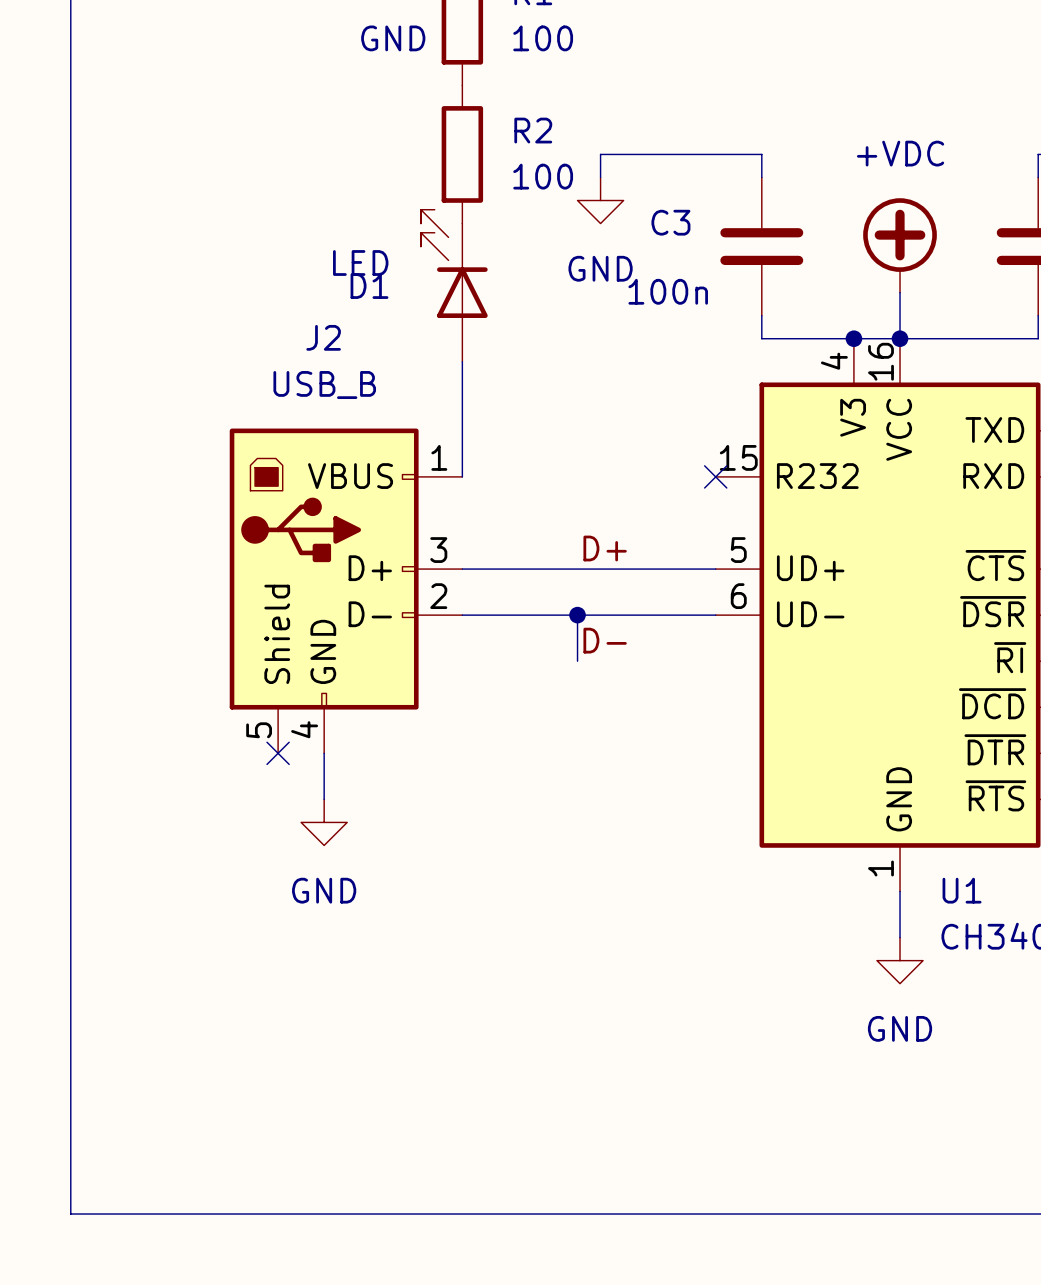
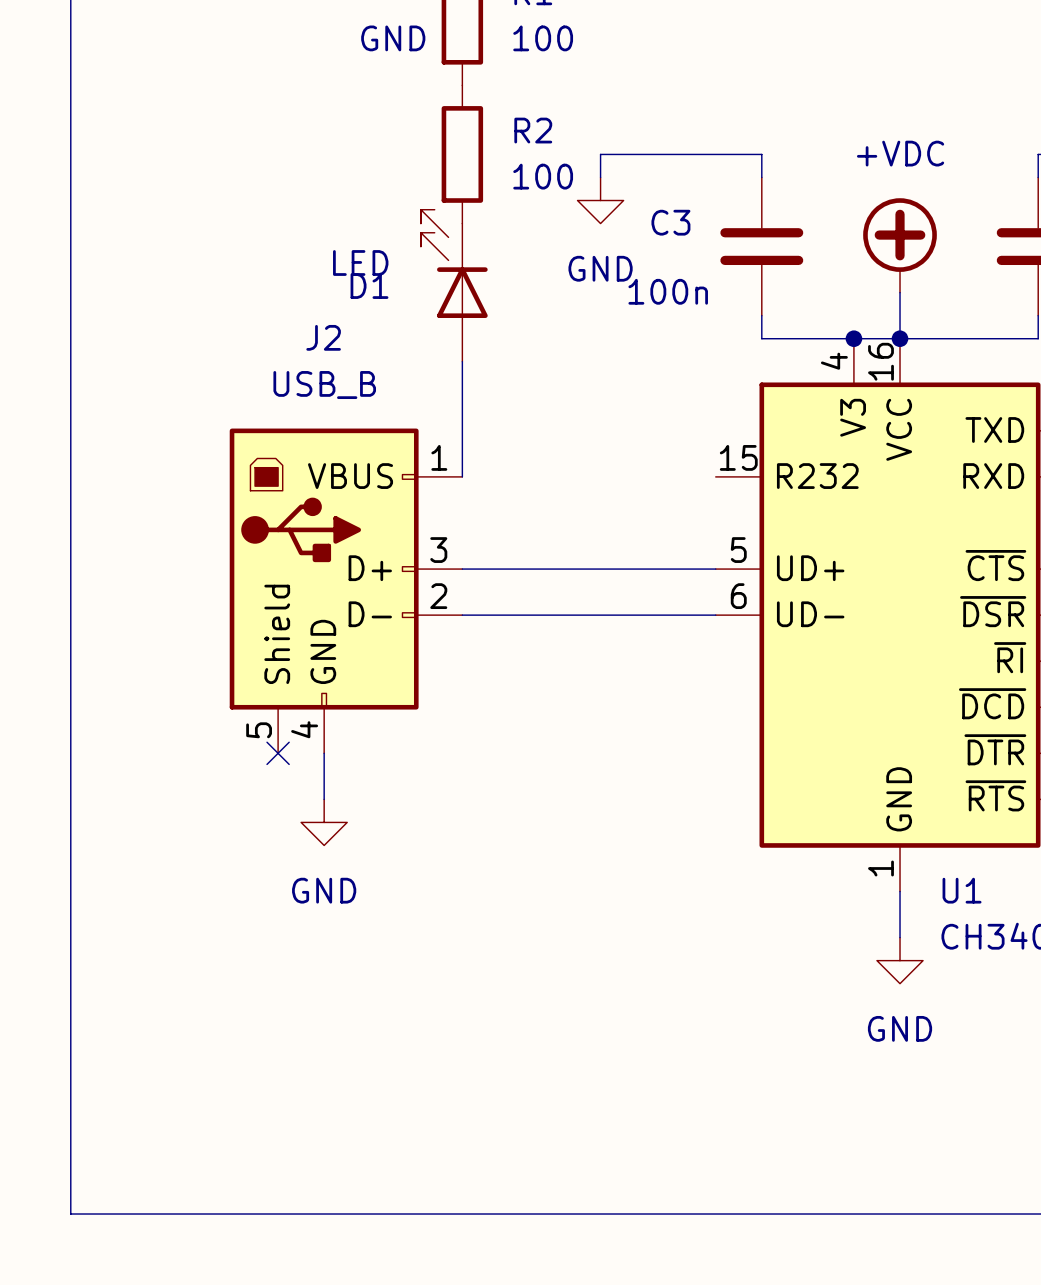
no-connect mark: (715, 476) -> none
label: D+ (605, 548) -> none
wire: (577, 615) (577, 661) -> none
junction: (577, 615) -> none
label: D- (605, 640) -> none

